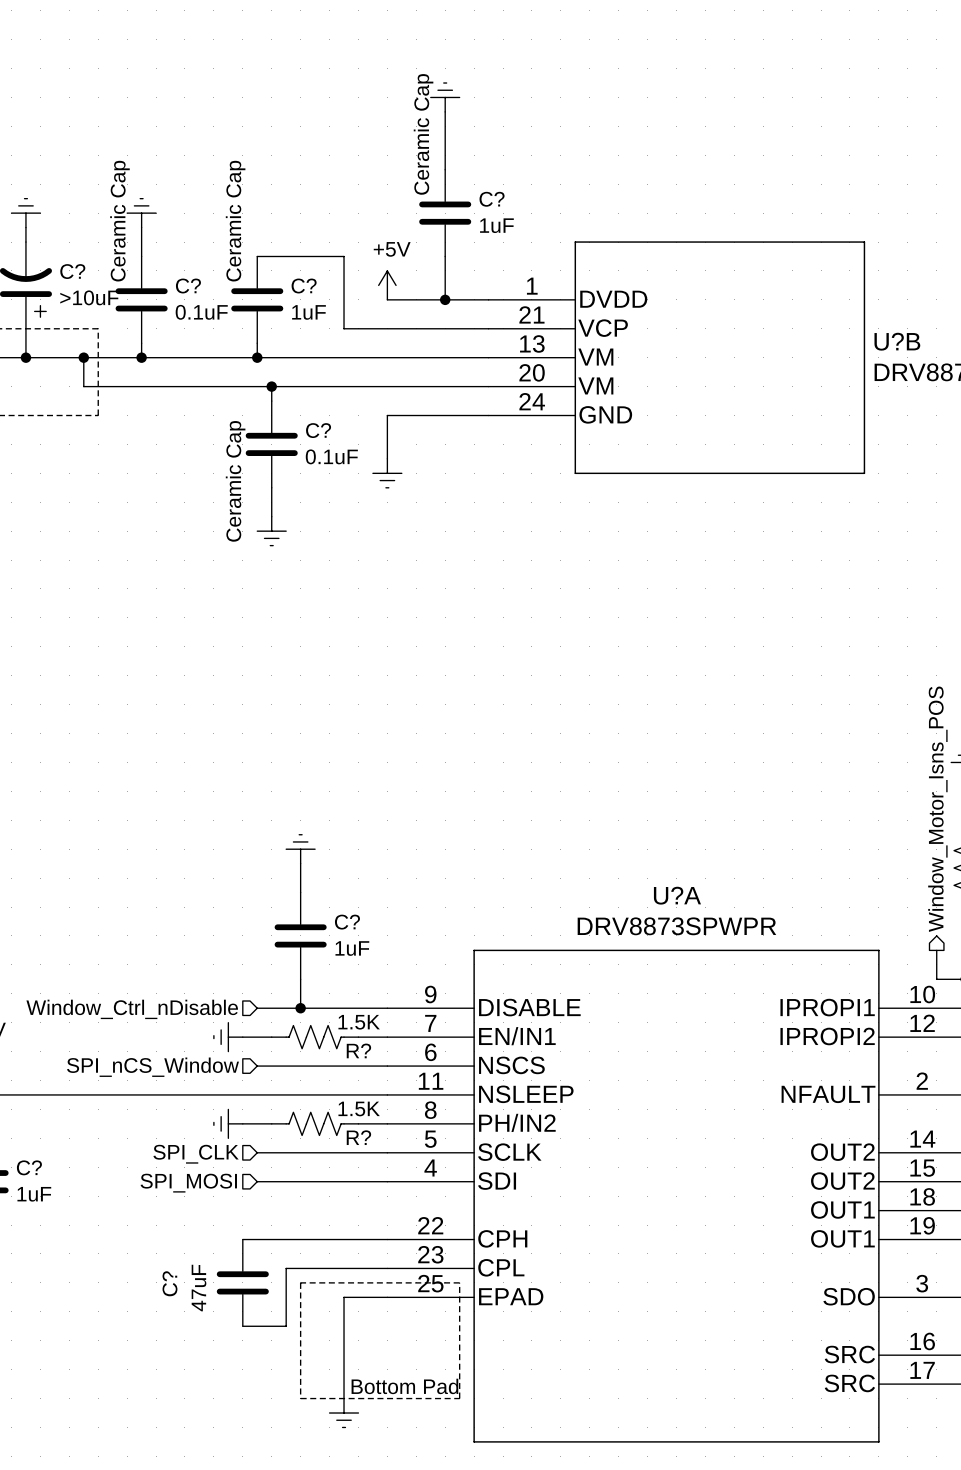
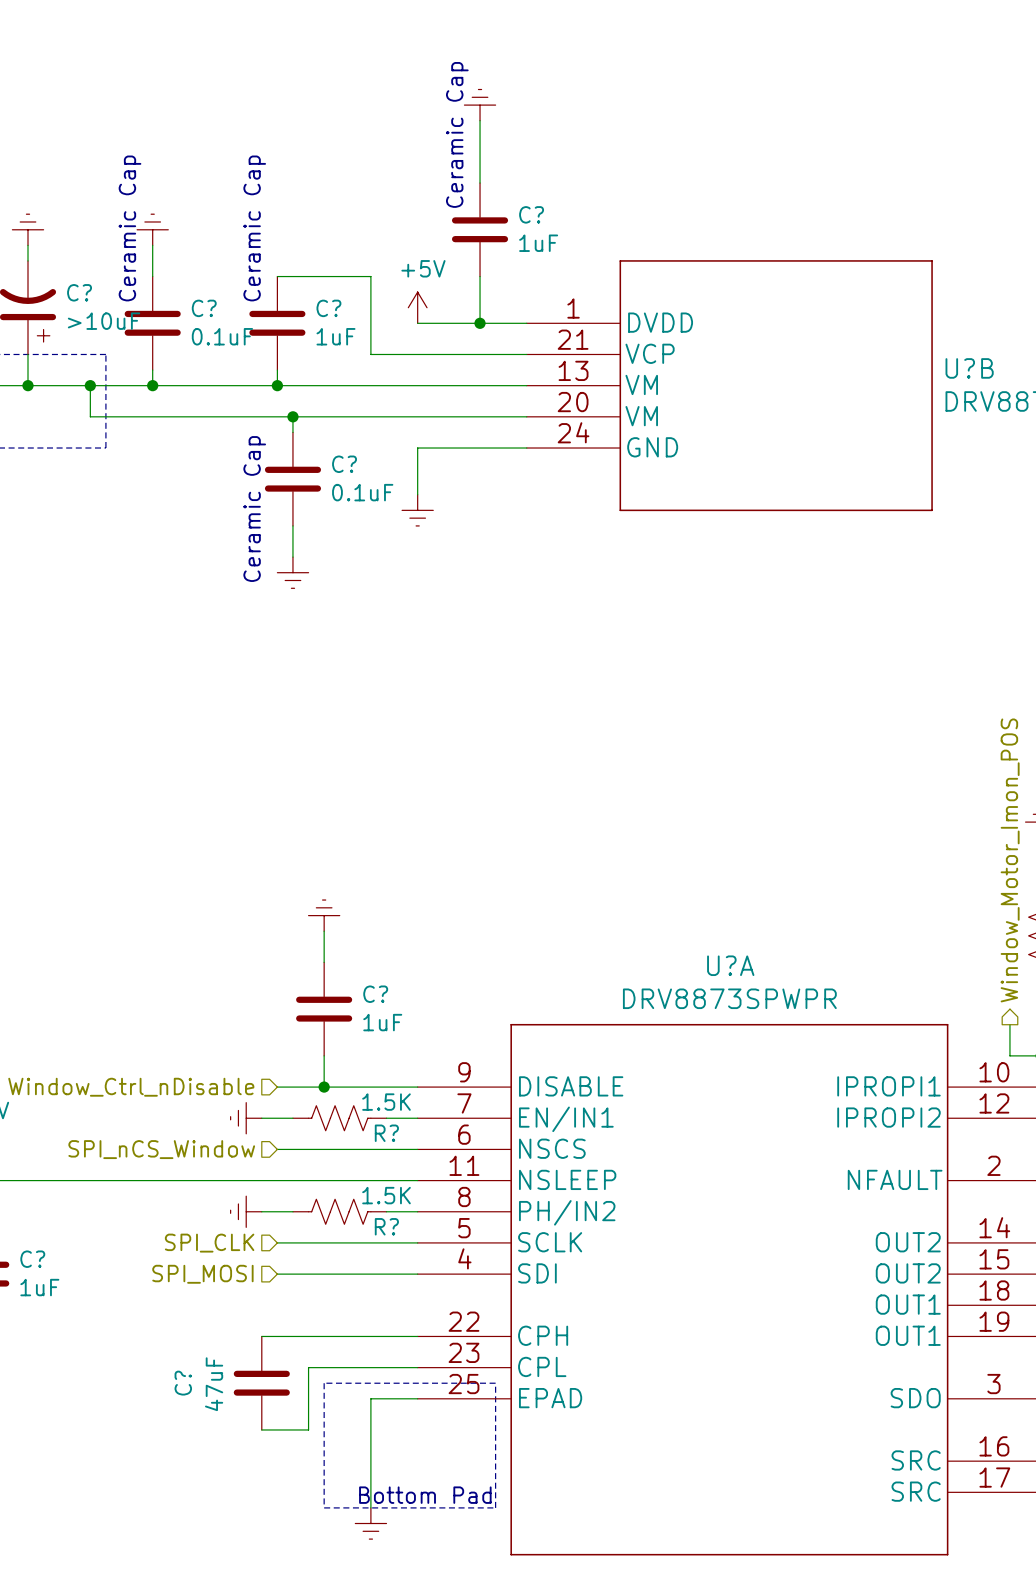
hierarchical label: Window_Motor_Isns_POS (937, 809) -> Window_Motor_Imon_POS (1010, 860)

